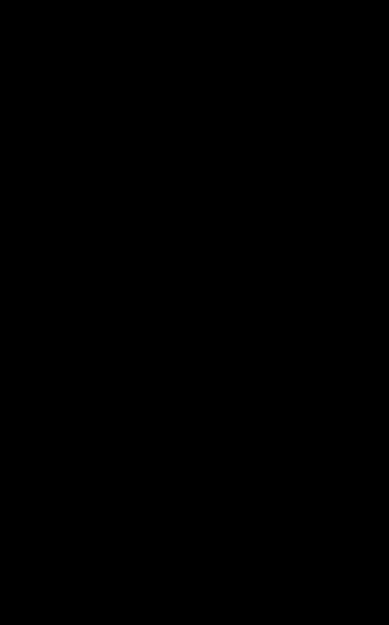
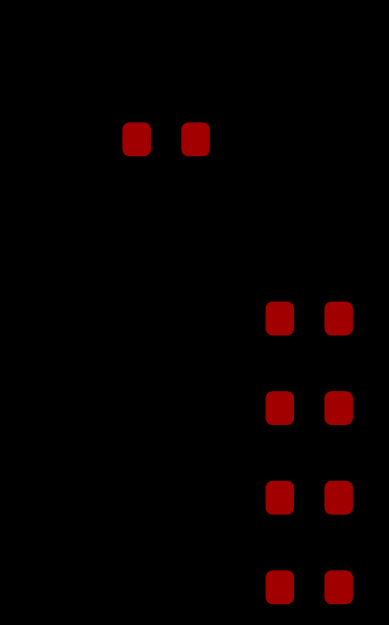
part: none -> (166, 139)
part: none -> (309, 318)
part: none -> (309, 408)
part: none -> (309, 497)
part: none -> (309, 587)

